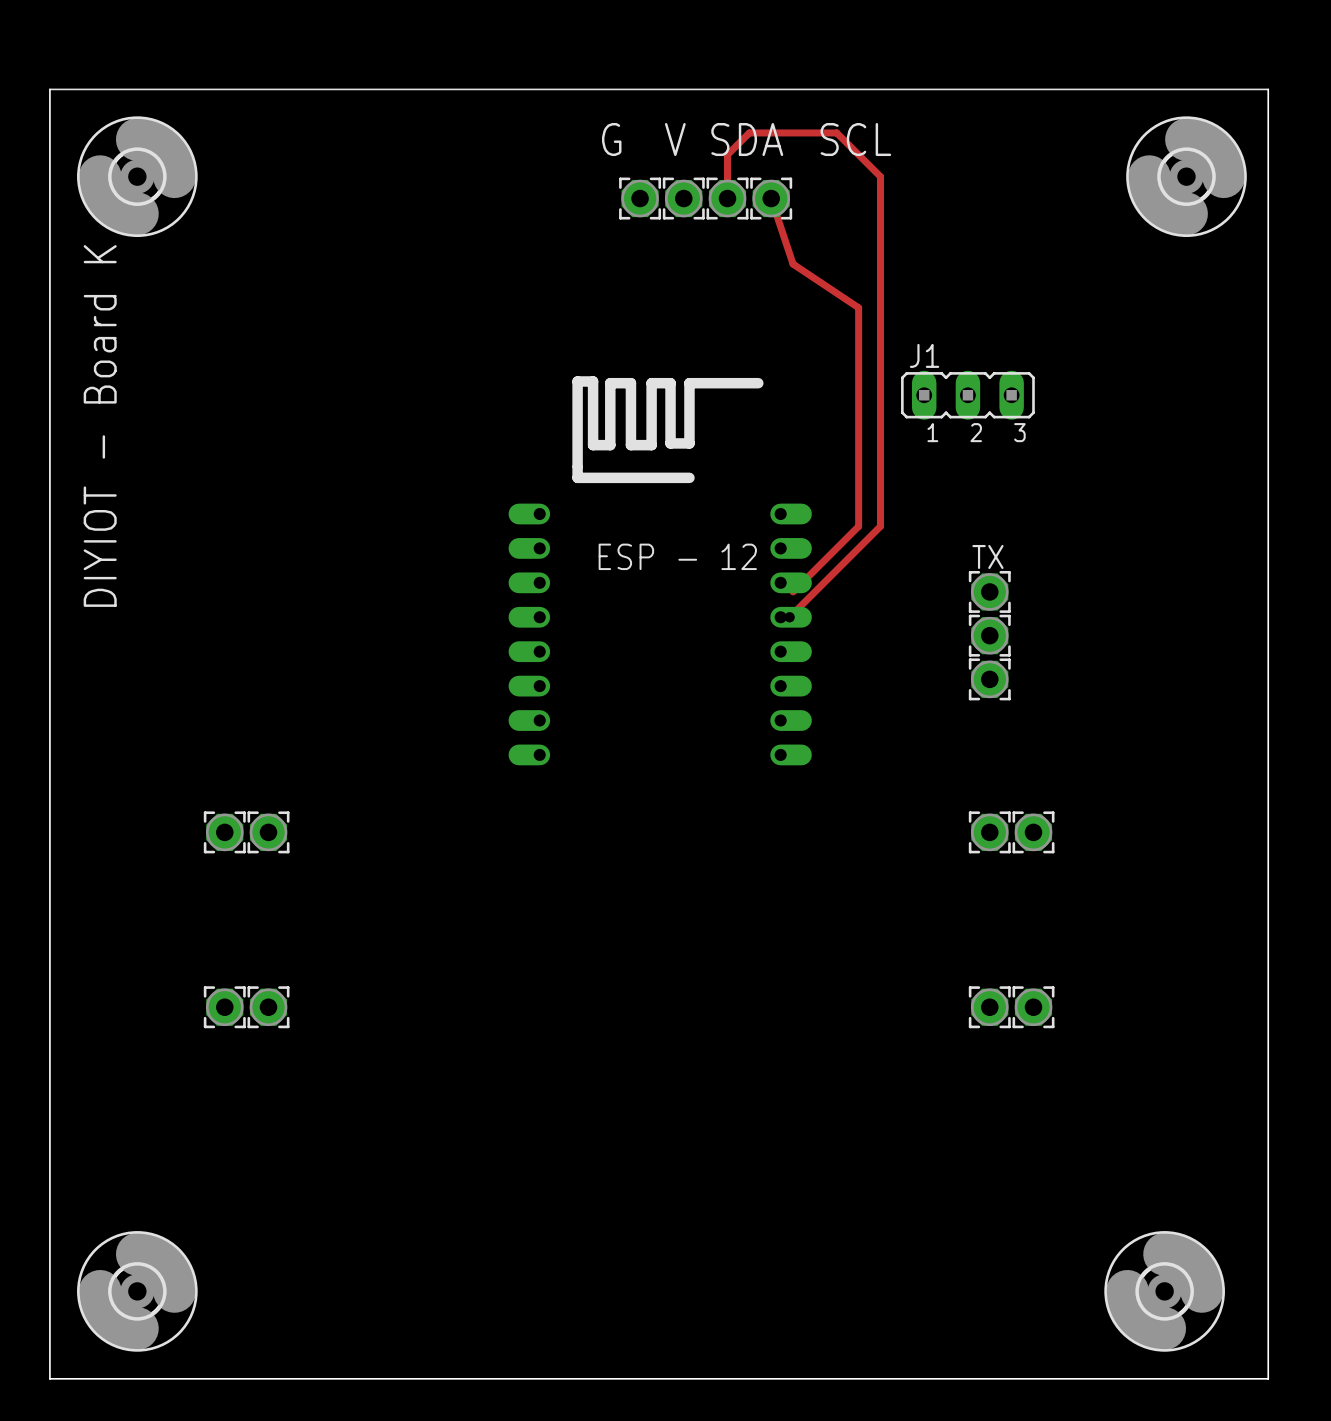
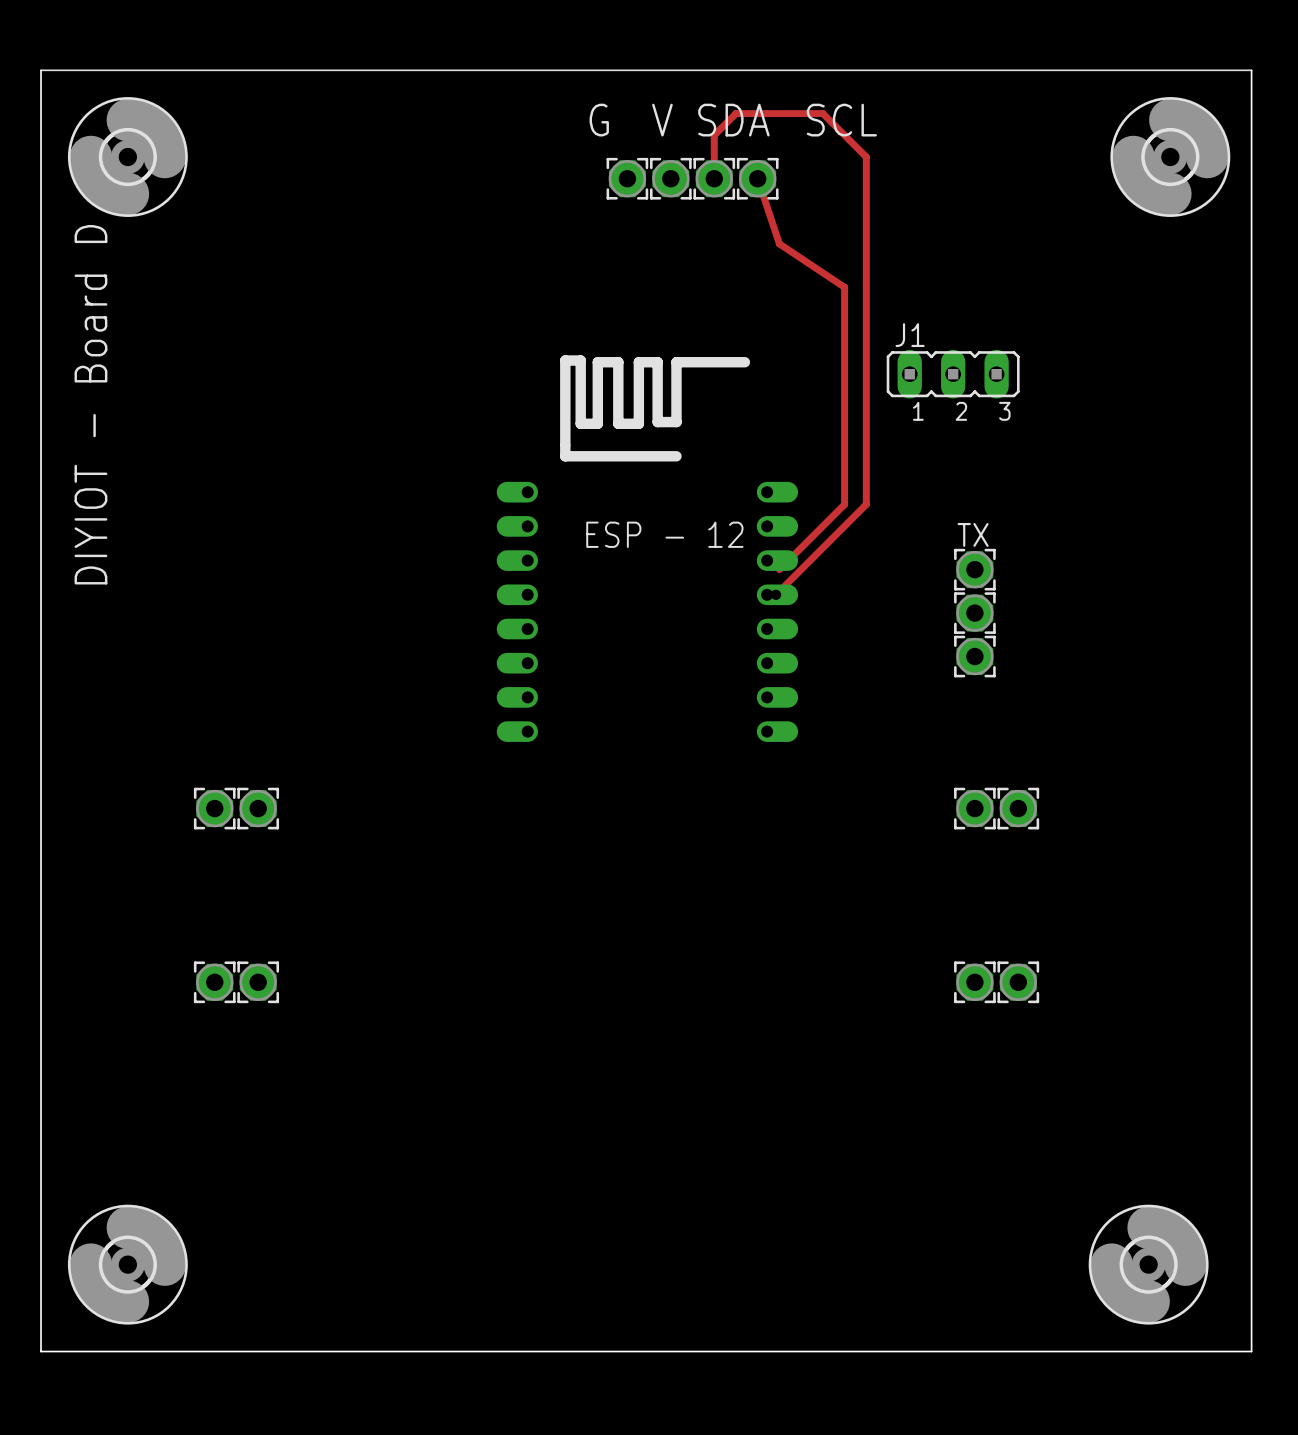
text: DIYIOT - Board K (100, 425) -> DIYIOT - Board D (90, 404)

